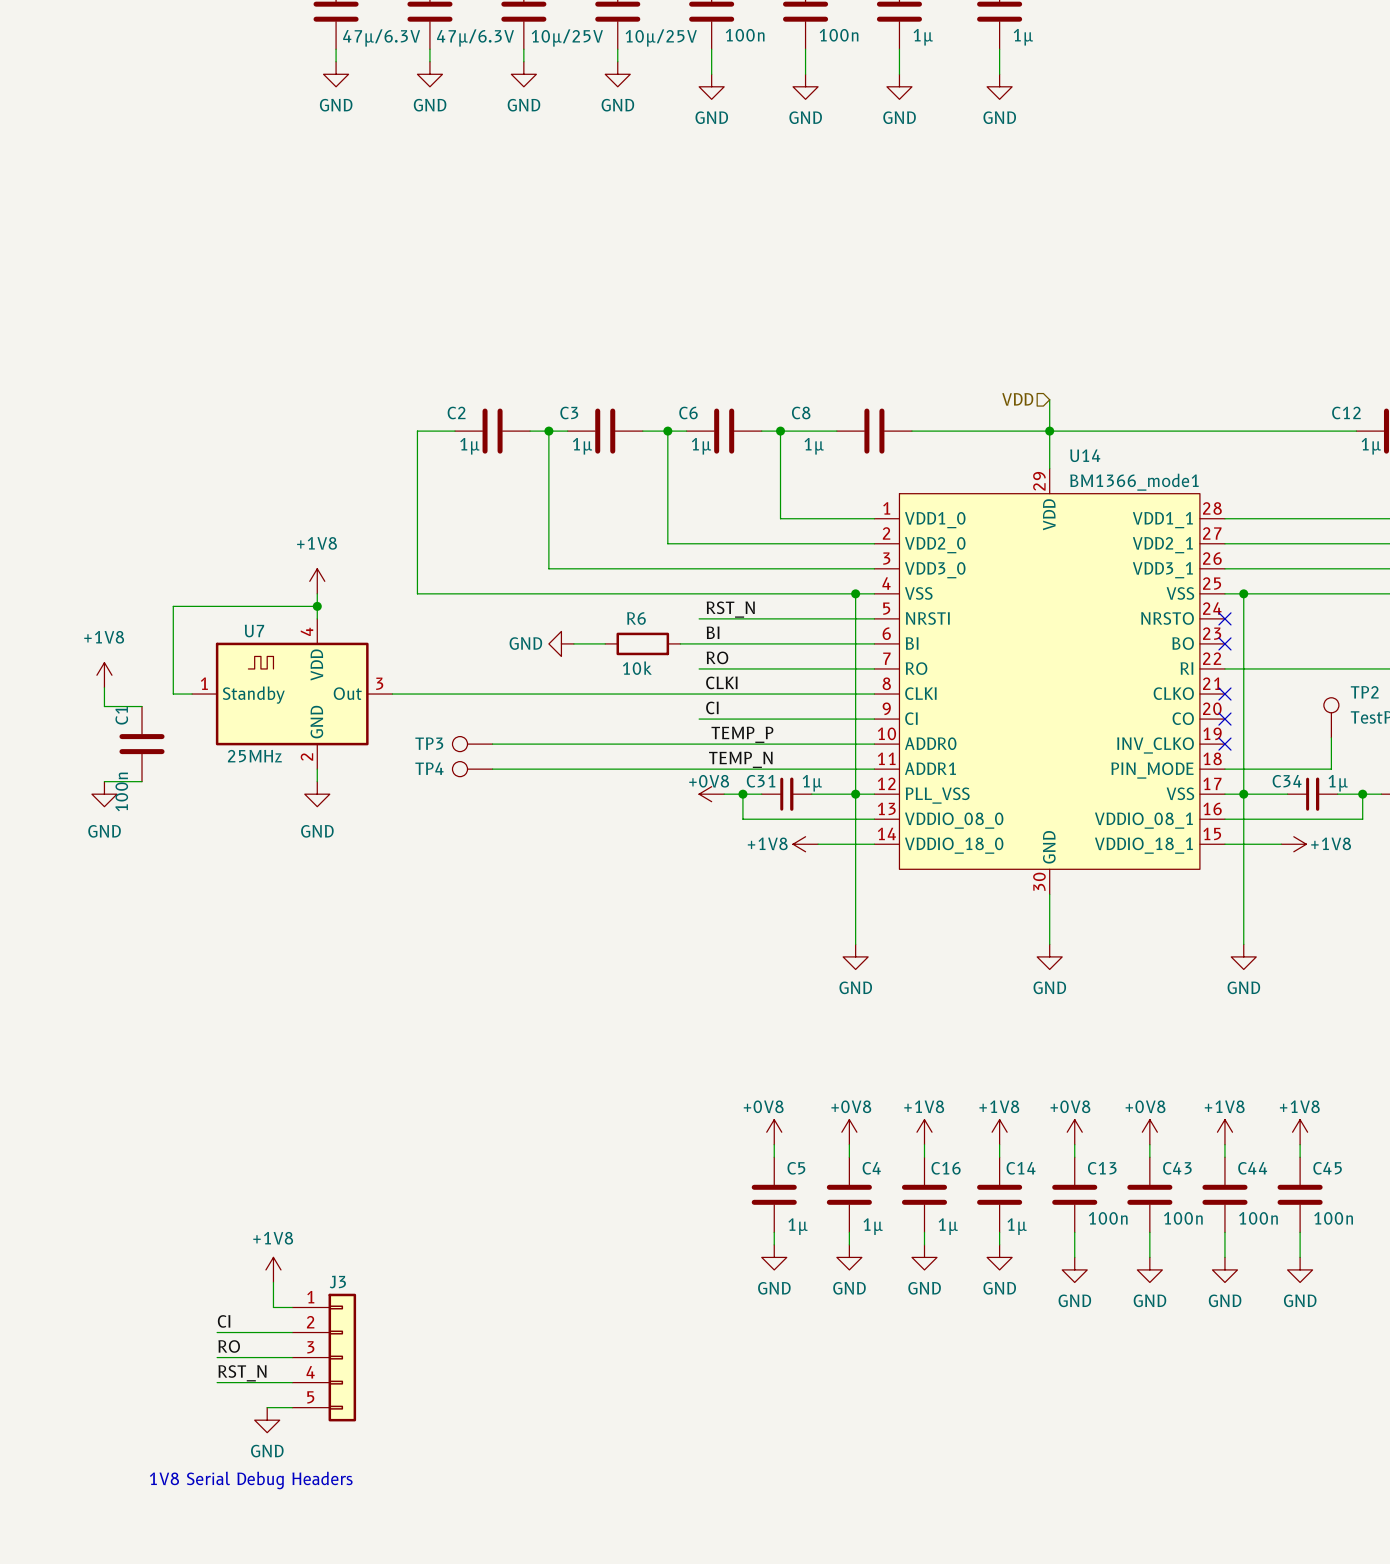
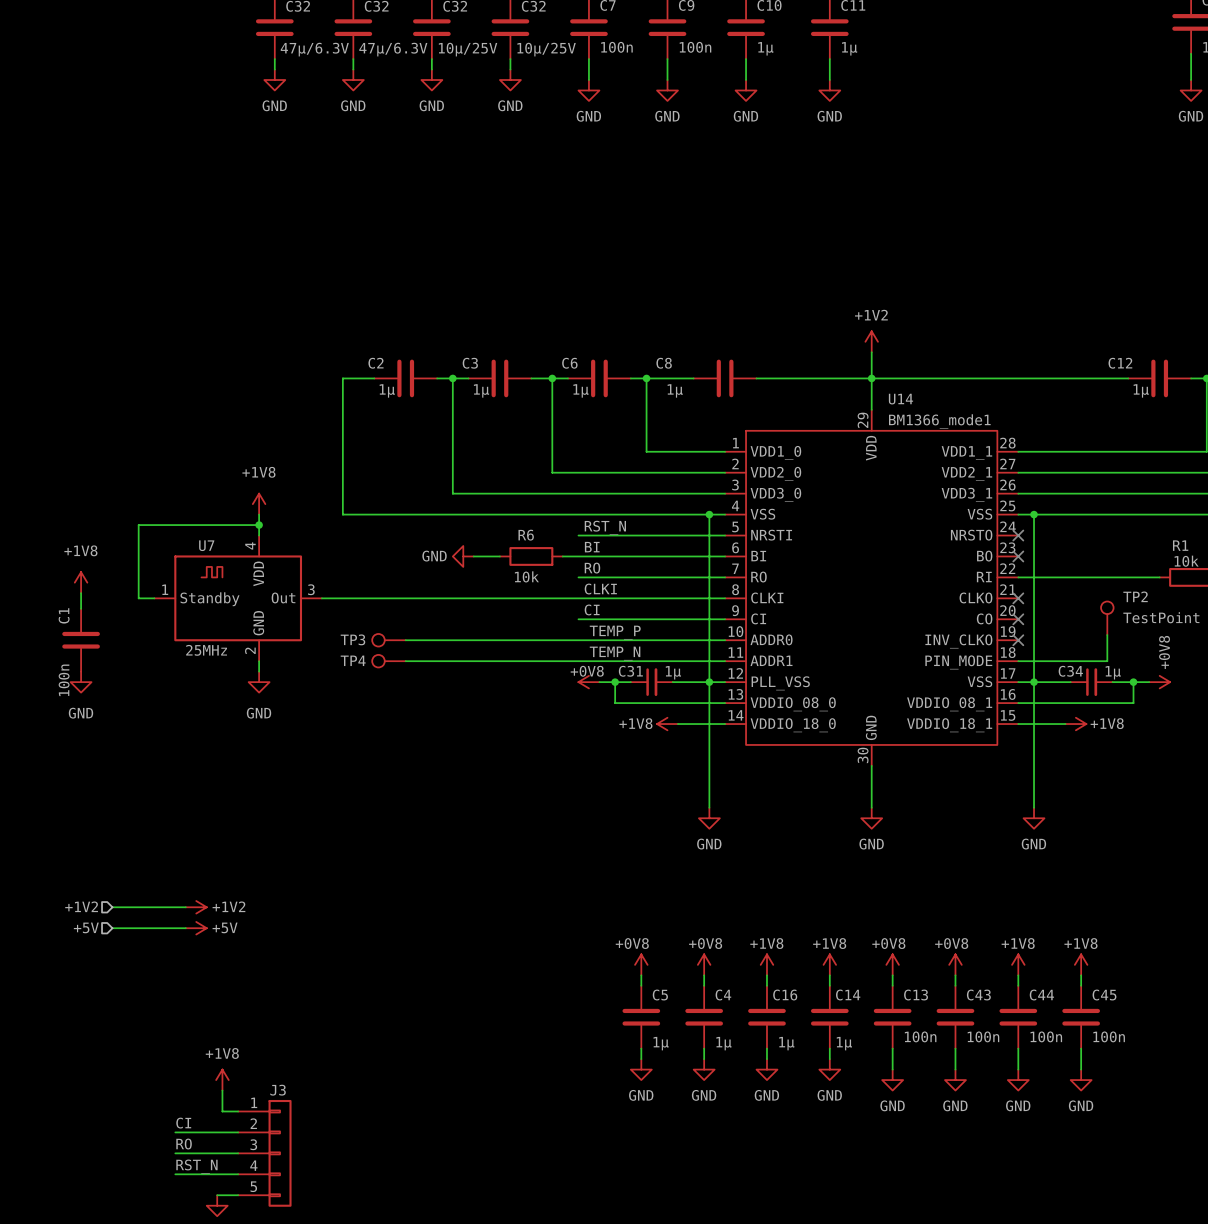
power symbol: none -> +1V2 (871, 341)
hierarchical label: VDD (1017, 399) -> none
wire: (104, 706) (142, 706) -> none
C1 position: (142, 744) -> (81, 640)
wire: (104, 781) (142, 781) -> none
hierarchical label: none -> +1V2 (81, 906)
wire: none -> (112, 907) (185, 907)
power symbol: none -> +1V2 (196, 907)
hierarchical label: none -> +5V (86, 927)
wire: none -> (112, 928) (185, 928)
power symbol: none -> +5V (196, 928)

